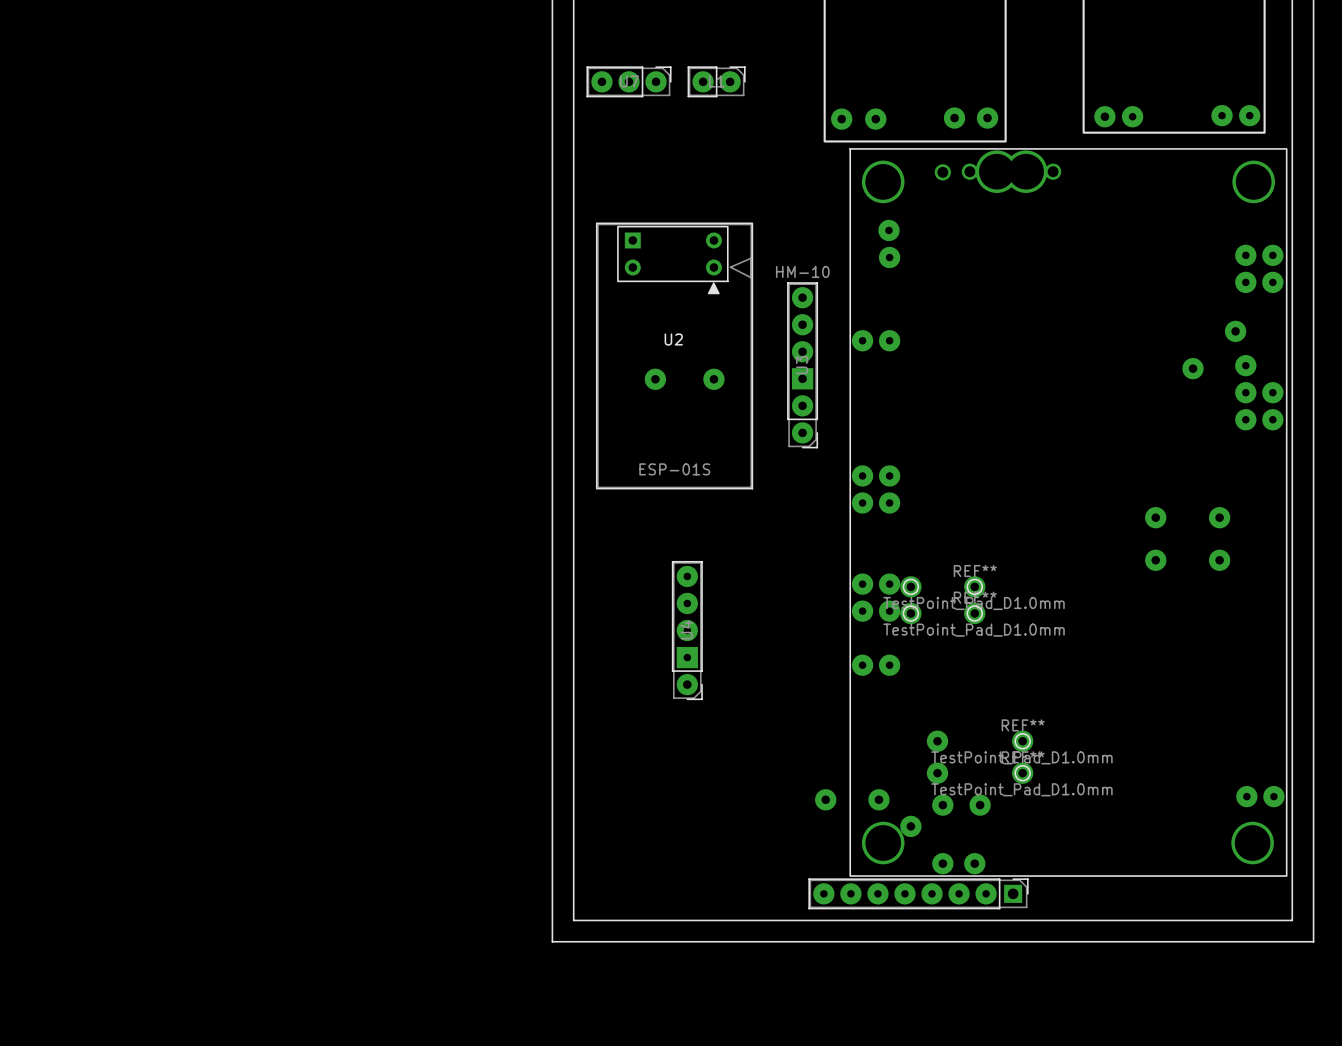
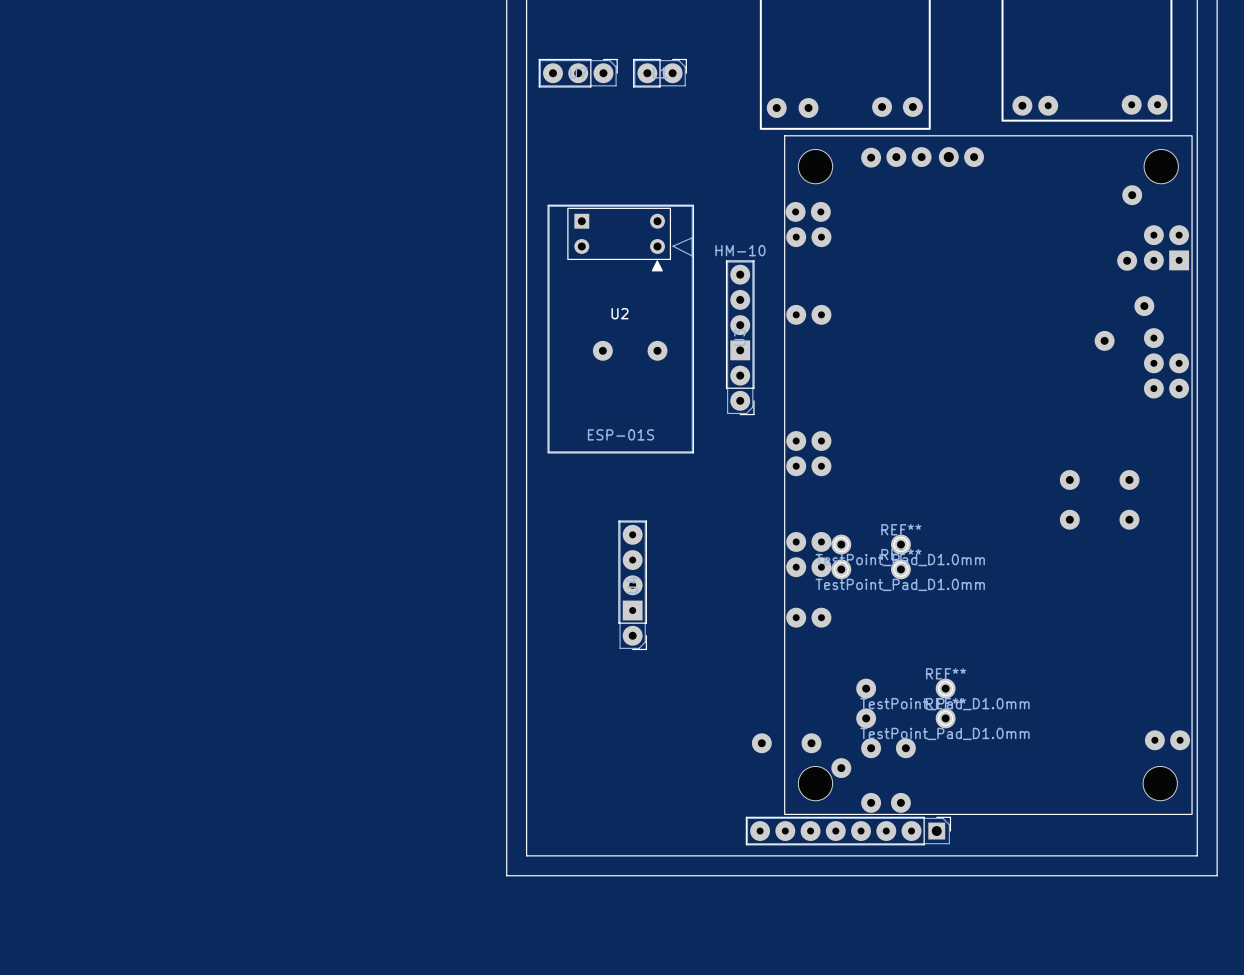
part footprint: [849, 148, 1288, 877] -> [784, 135, 1193, 815]
part: none -> (1132, 195)
part: none -> (795, 211)
part: none -> (796, 237)
part: none -> (1127, 260)

